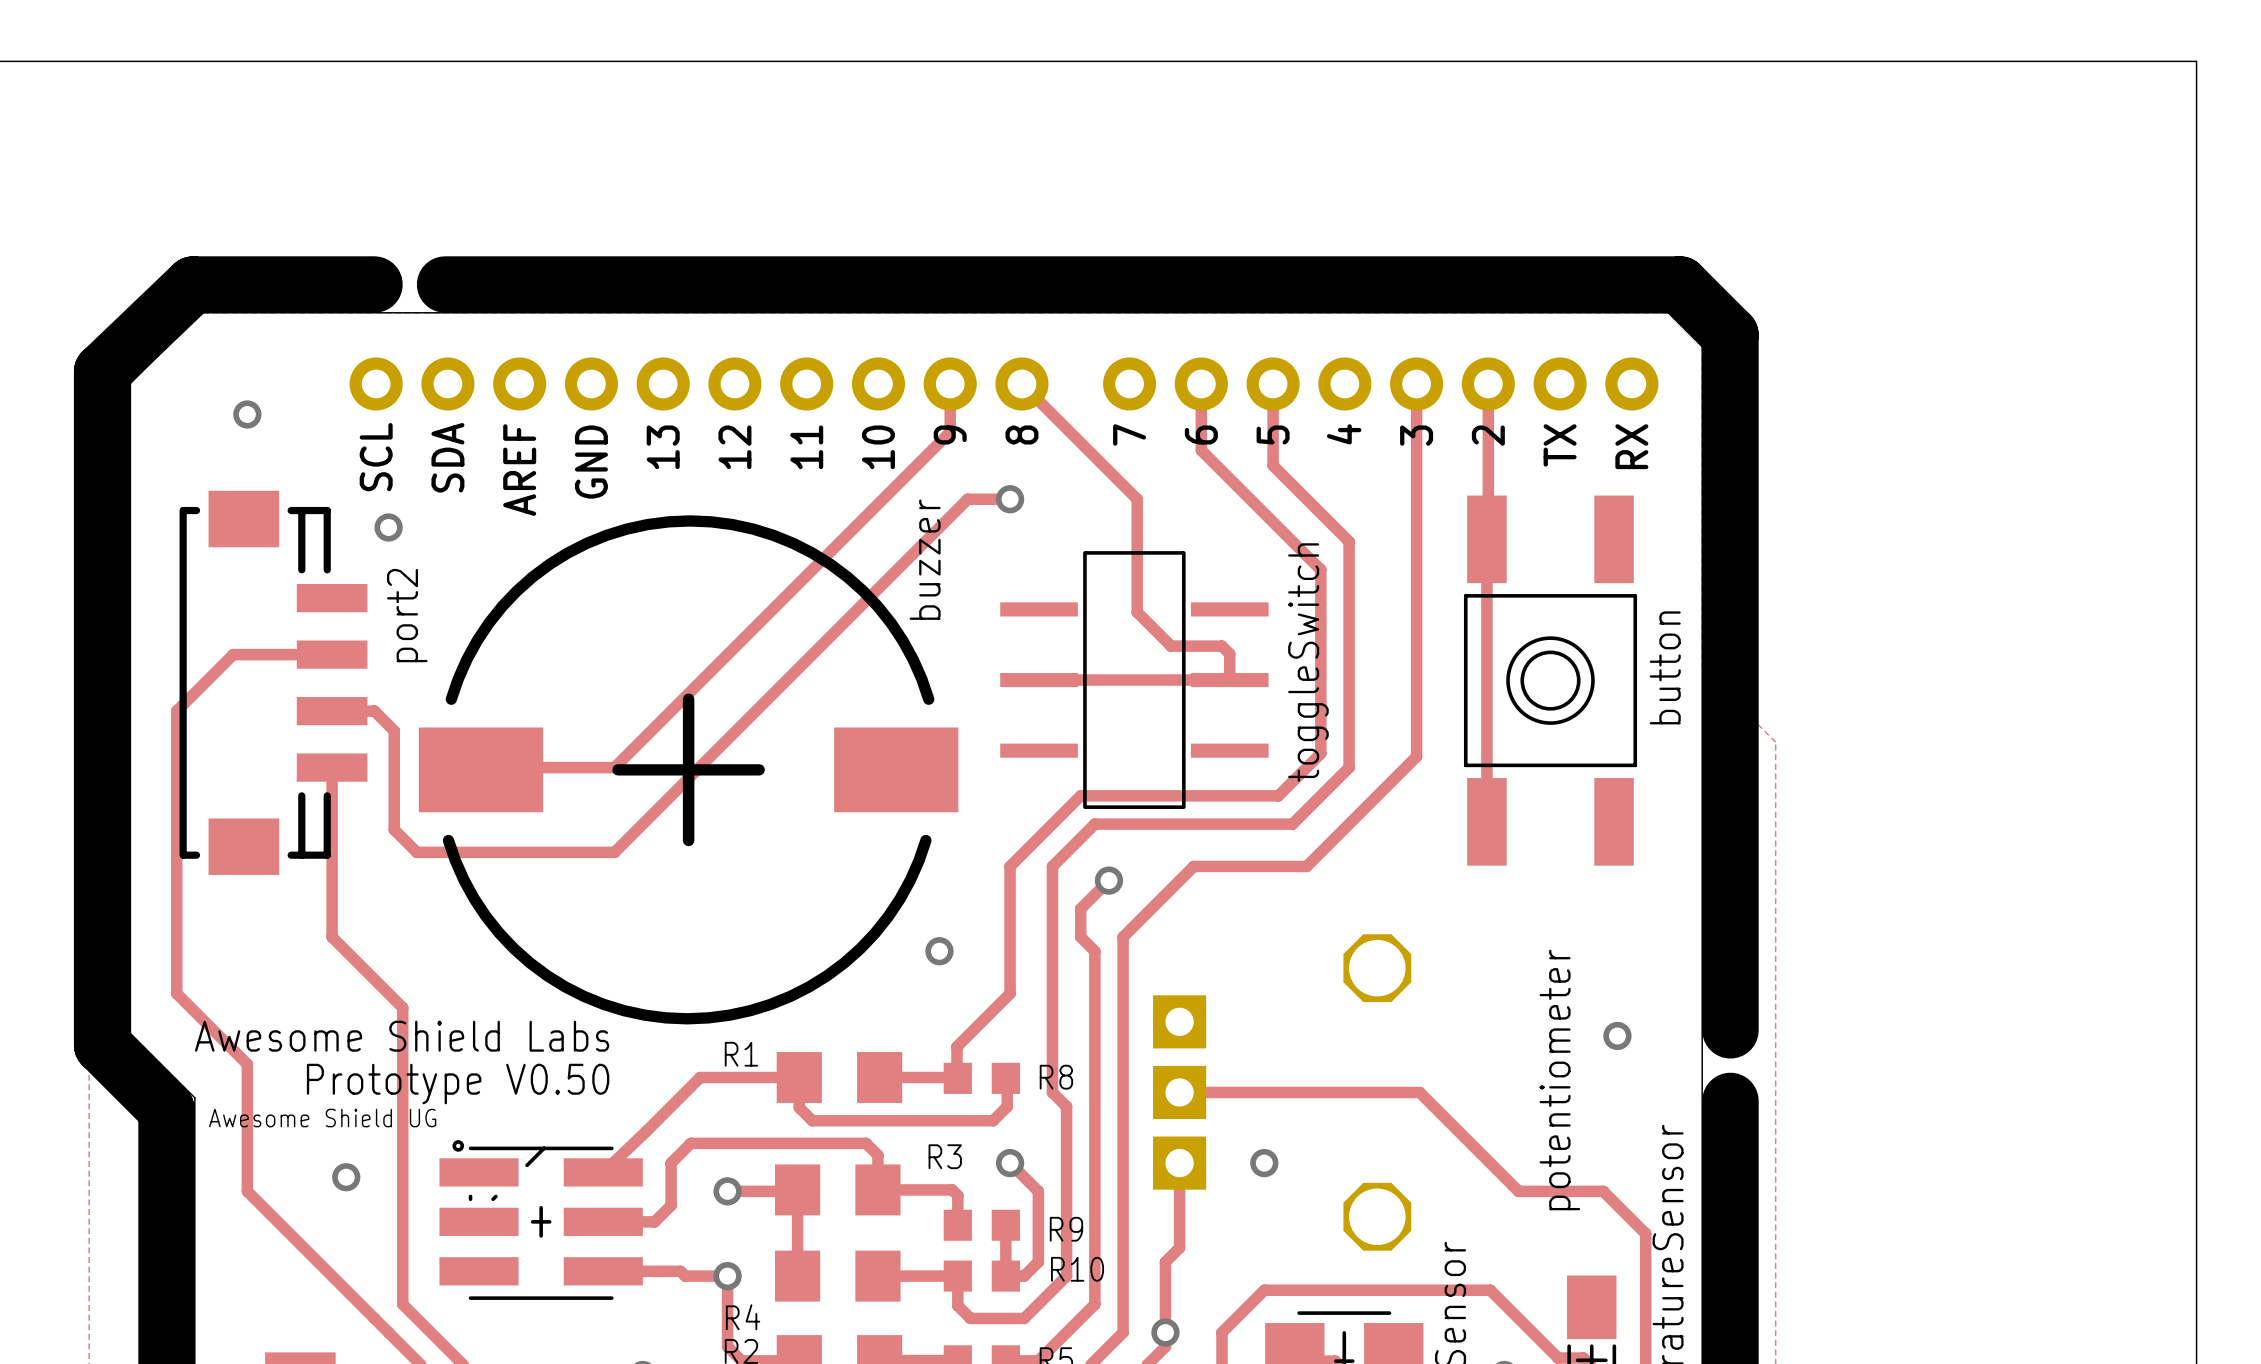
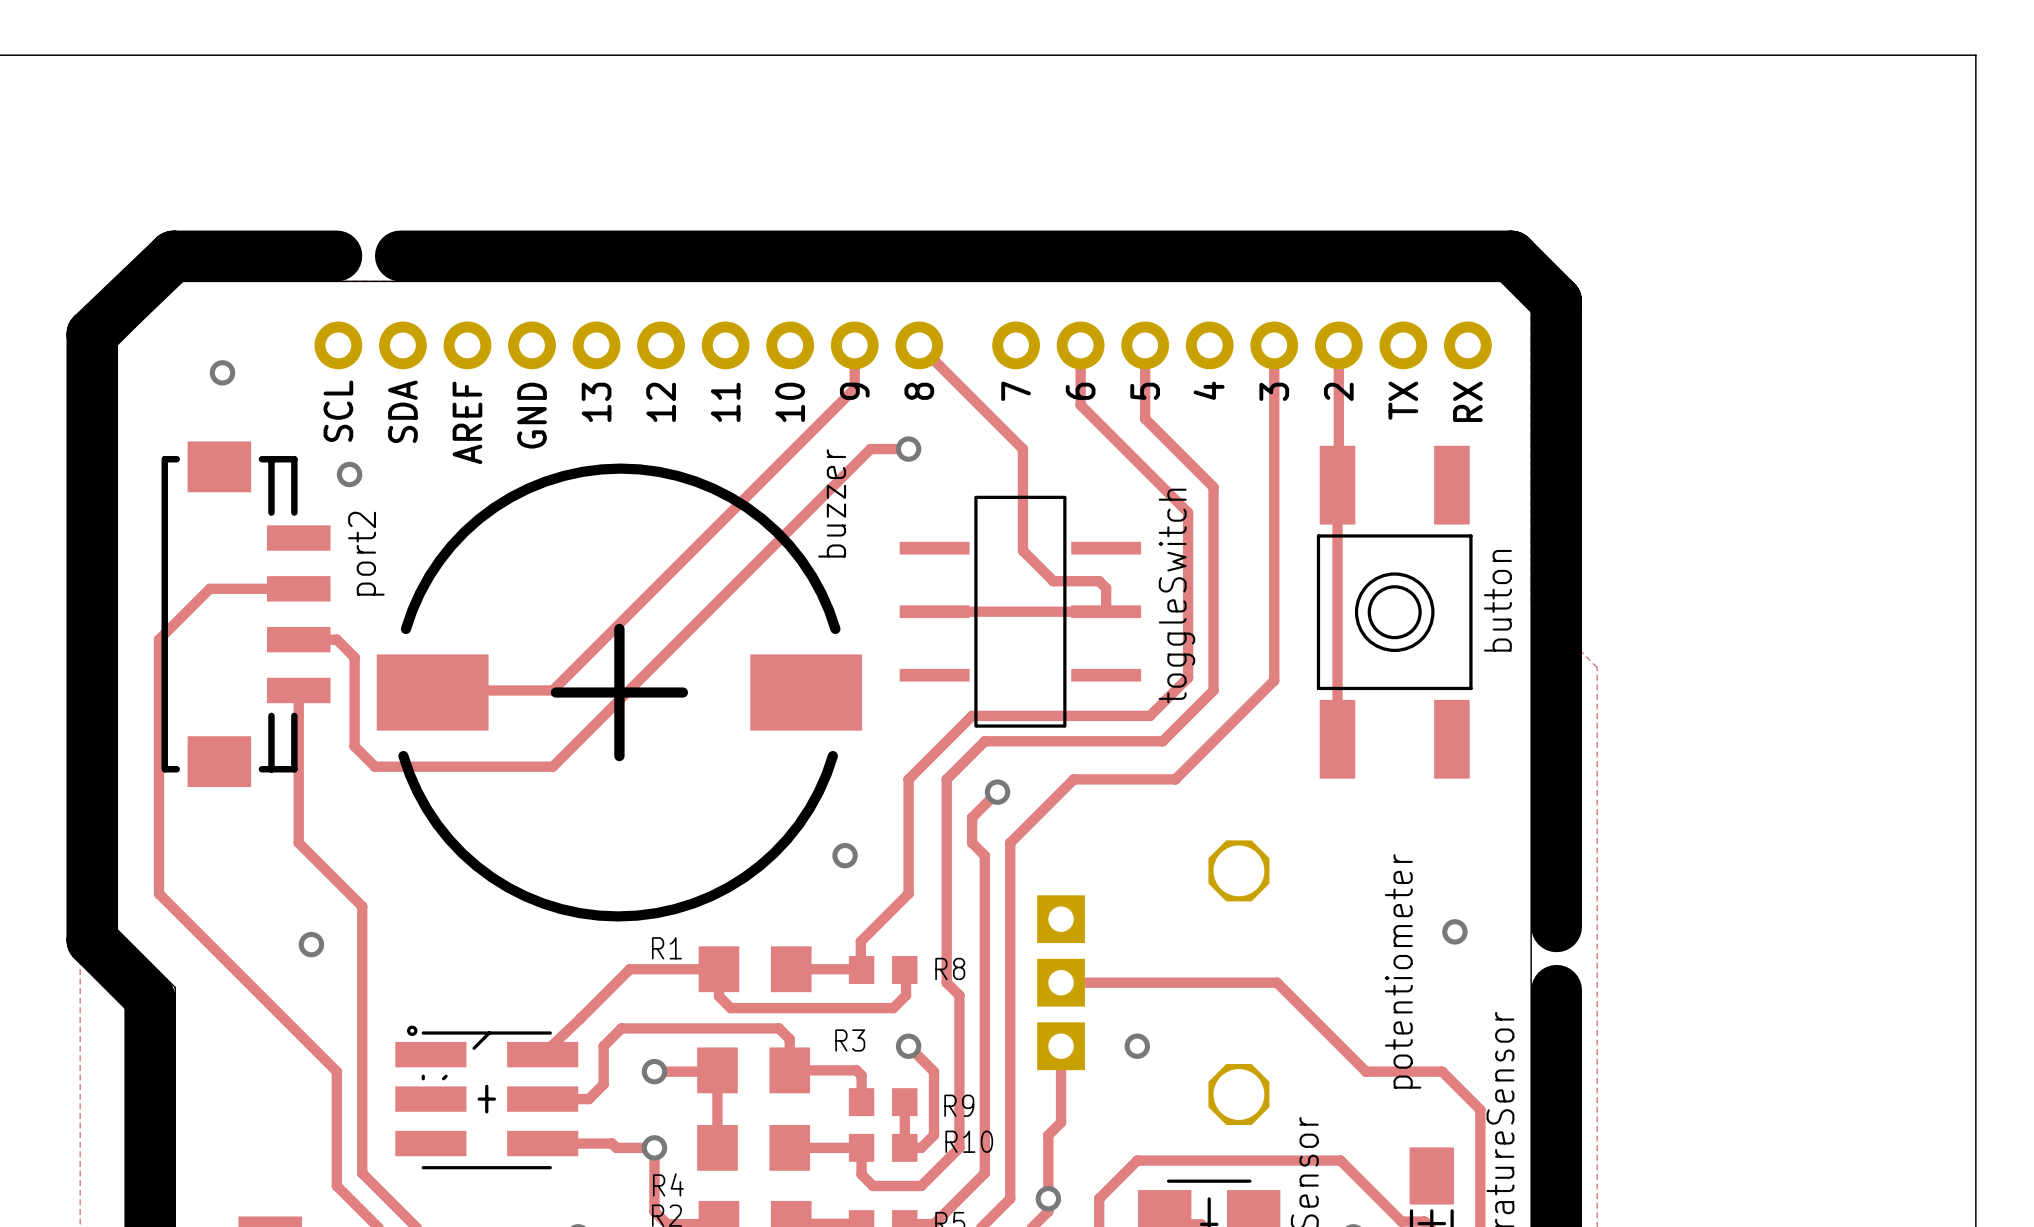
text: Awesome Shield Labs (402, 1036) -> none
track: (247, 1064) (247, 1191) (374, 1318) -> (222, 957) (336, 1071) (336, 1185)
text: Prototype V0.50 (458, 1084) -> none
text: Awesome Shield UG (322, 1118) -> none
via position: (346, 1177) -> (311, 944)

